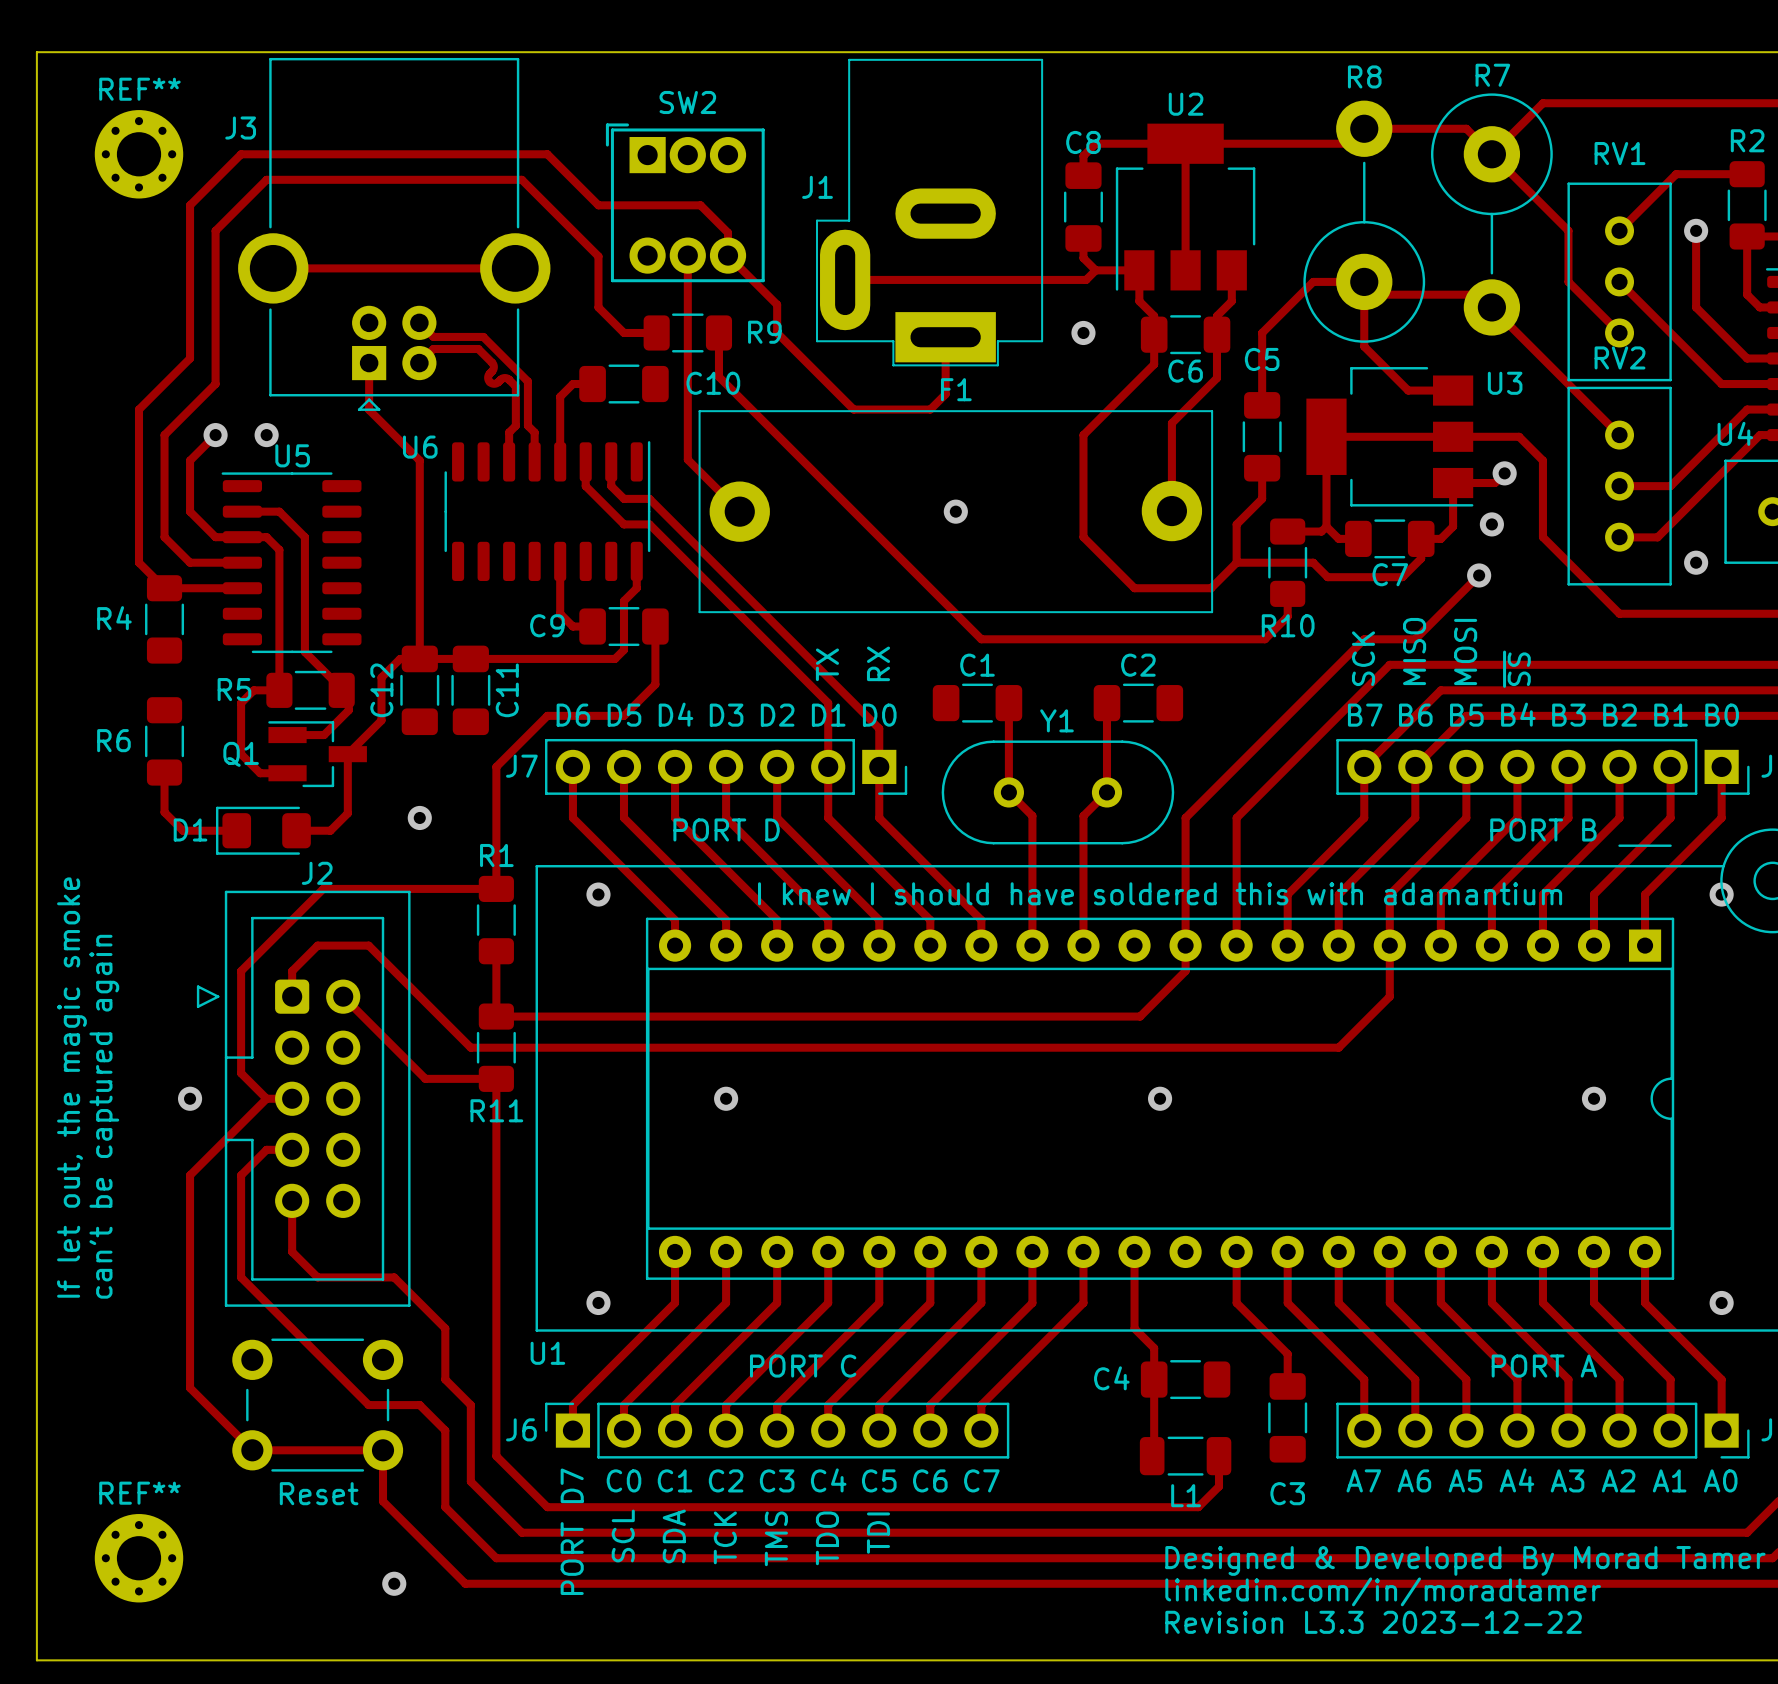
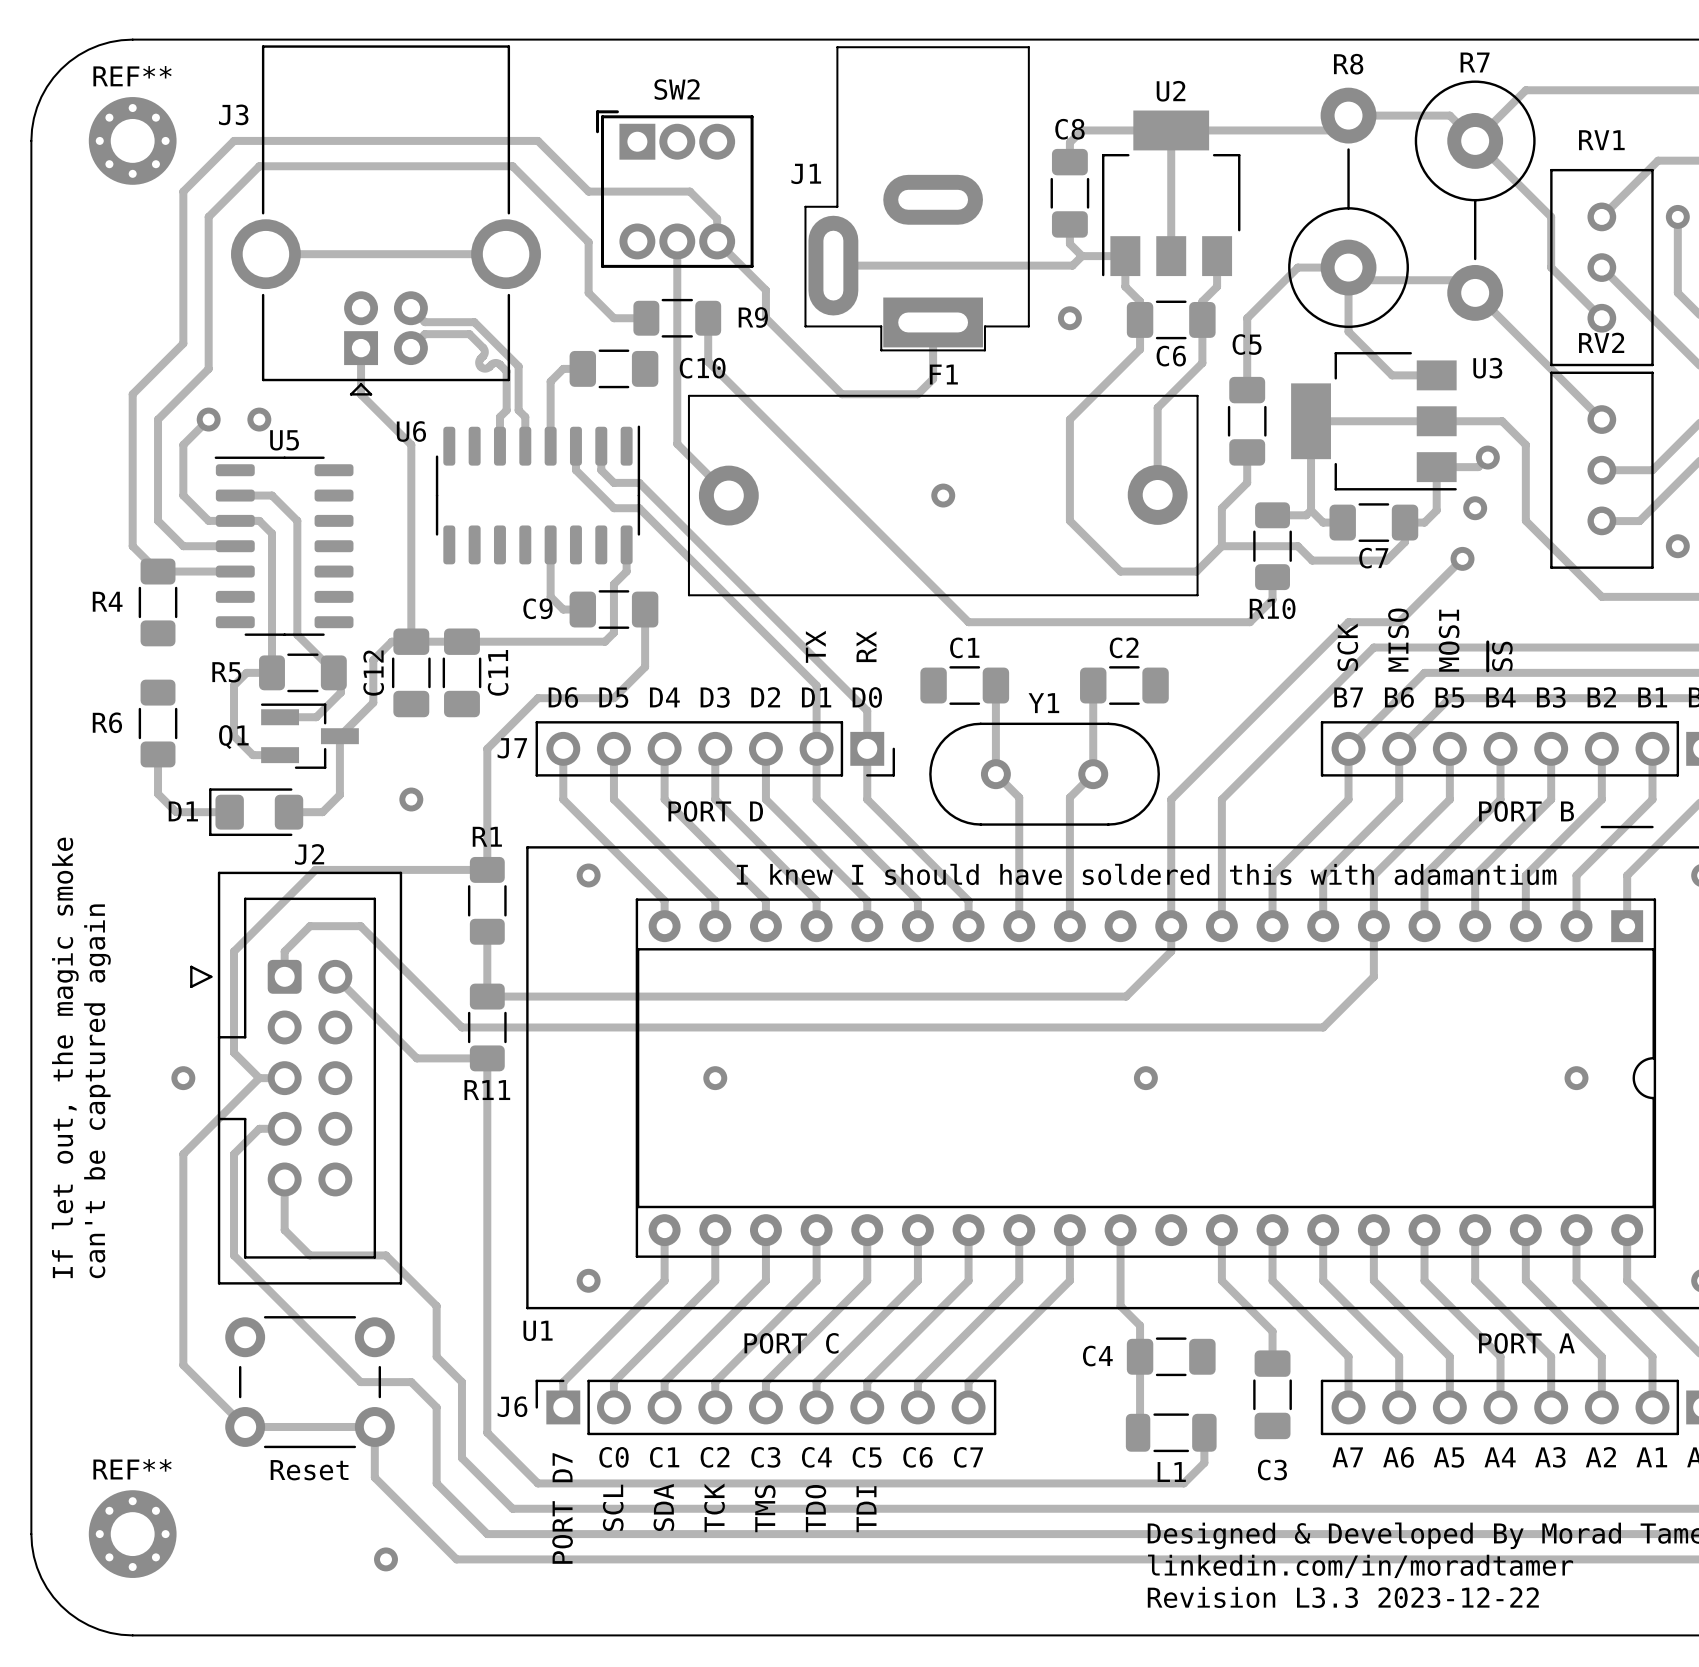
board edge: (139, 52) (36, 52) (36, 154) -> (132, 39) (110, 42) (88, 49) (61, 69) (41, 96) (33, 118) (31, 140)
board edge: (36, 1558) (36, 1660) (139, 1660) -> (31, 1534) (33, 1556) (41, 1578) (61, 1605) (78, 1619) (99, 1629) (132, 1635)

